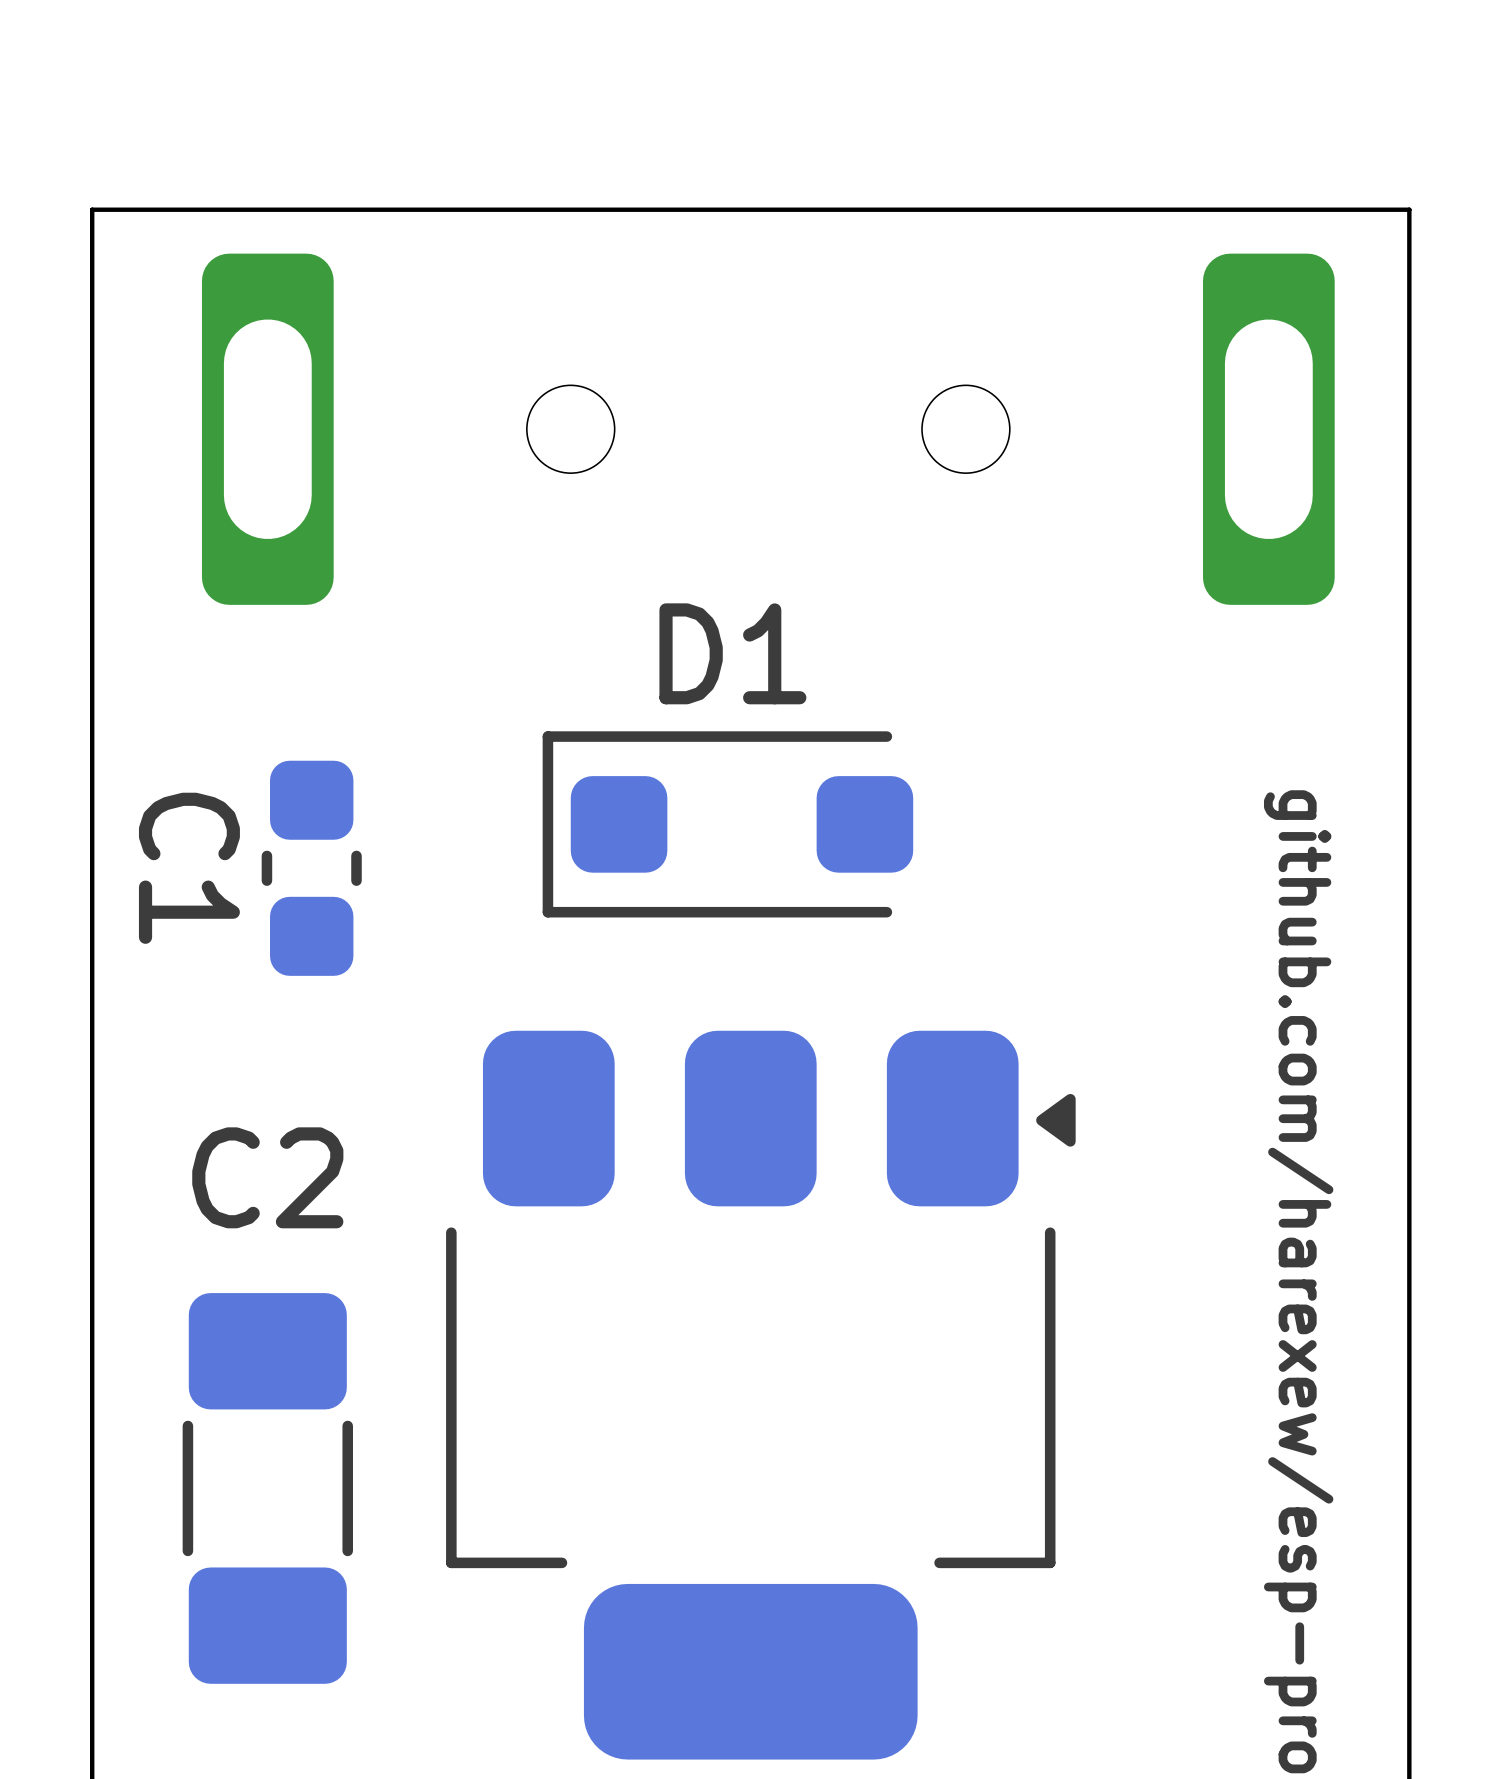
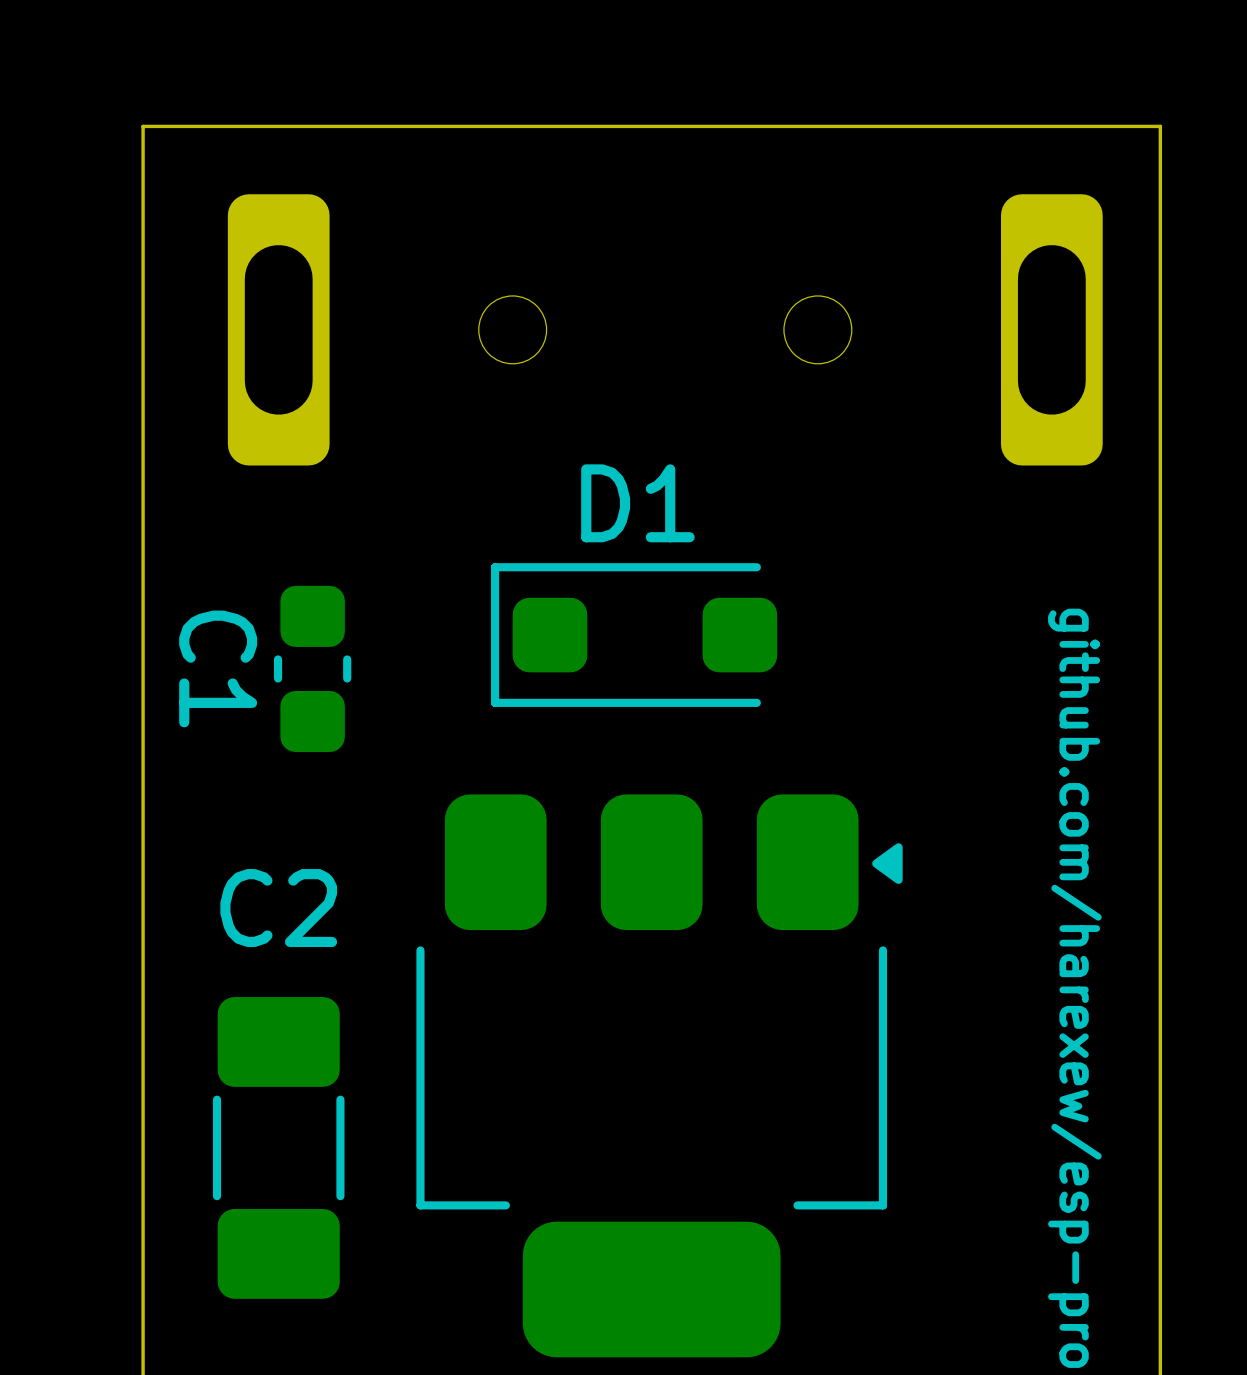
board edge: (1409, 209) (92, 209) -> (1160, 160) (1160, 126) (143, 126) (143, 160)

